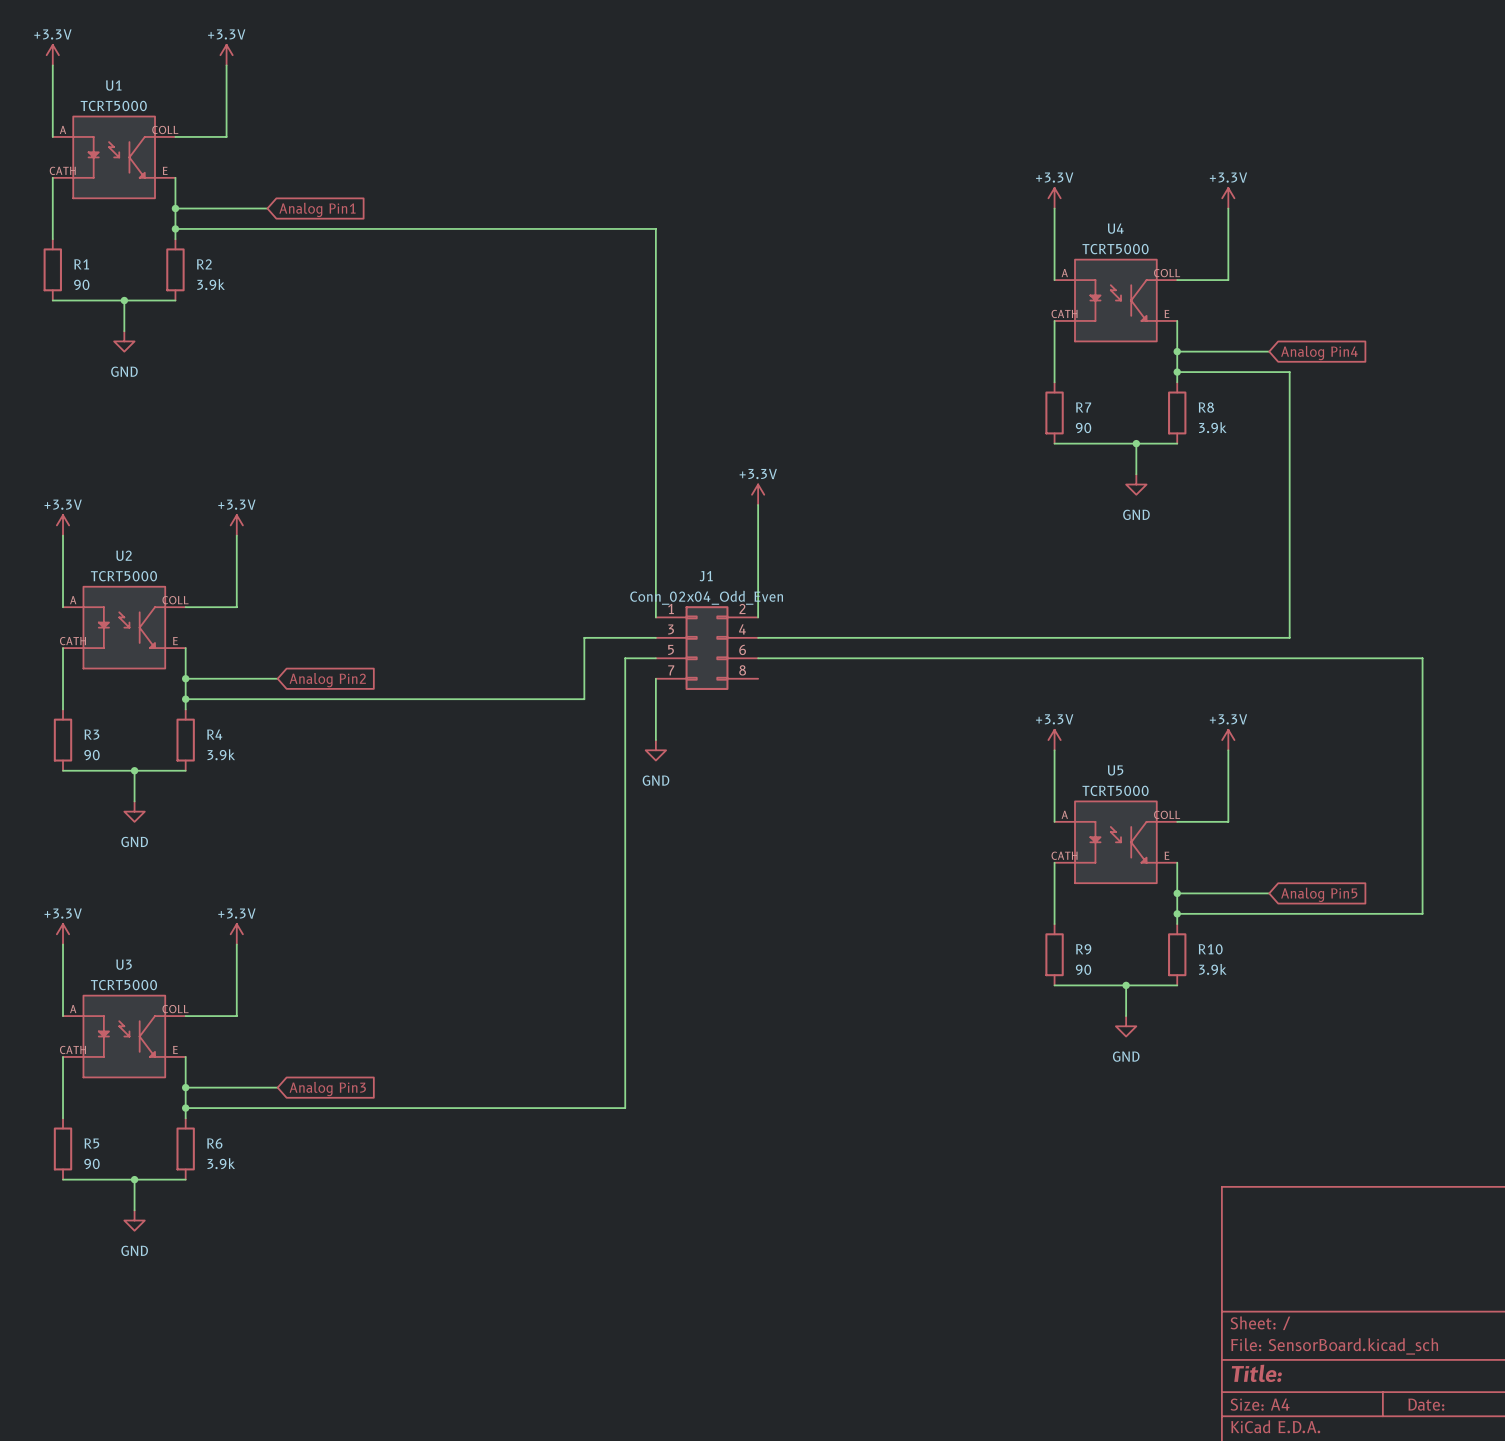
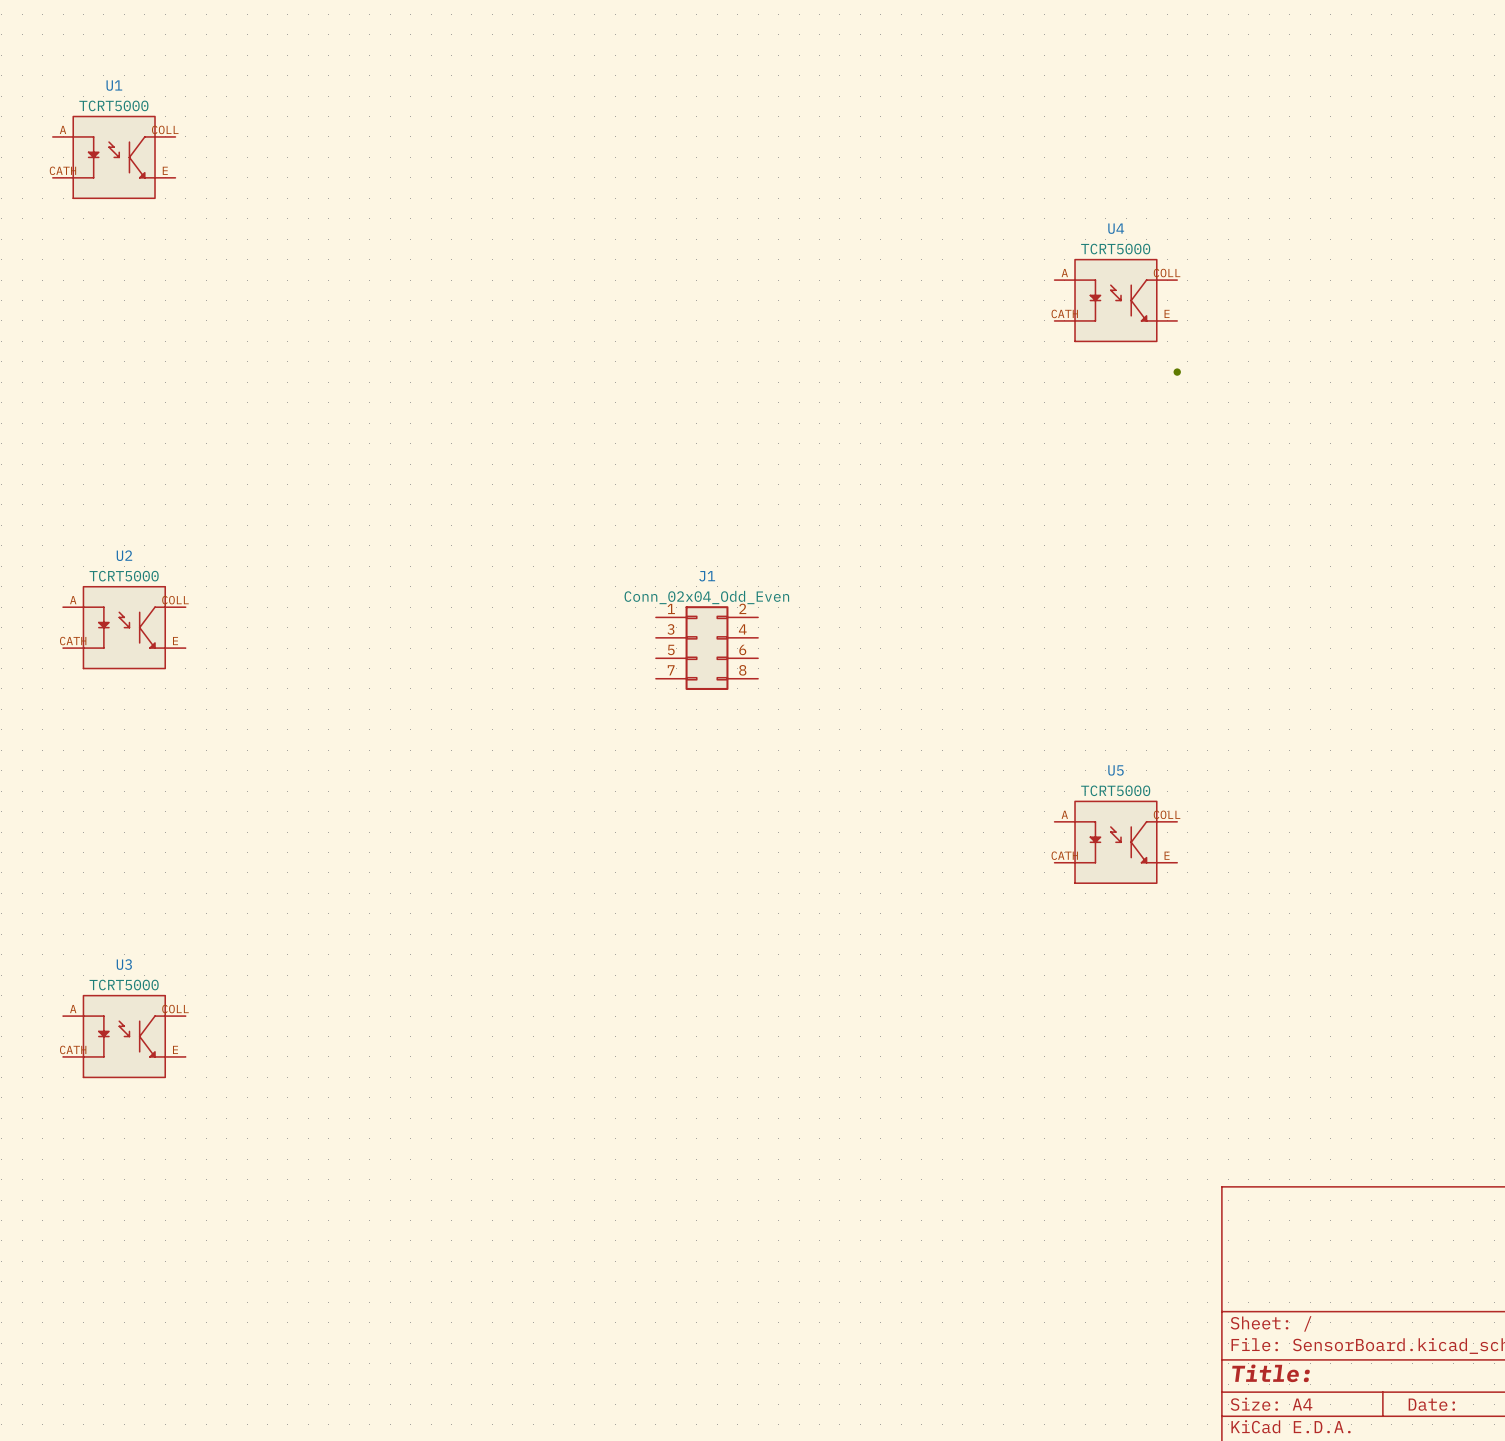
power symbol: +3.3V (52, 55) -> none
power symbol: +3.3V (226, 55) -> none
wire: (52, 65) (52, 136) -> none
wire: (226, 65) (226, 136) (175, 136) -> none
wire: (52, 177) (52, 239) -> none
wire: (175, 177) (175, 239) -> none
power symbol: +3.3V (1054, 198) -> none
power symbol: +3.3V (1228, 198) -> none
wire: (175, 208) (267, 208) -> none
junction: (175, 208) -> none
wire: (1054, 208) (1054, 280) -> none
wire: (1228, 208) (1228, 280) (1177, 280) -> none
global label: Analog Pin1 (317, 209) -> none
wire: (175, 228) (655, 228) (655, 617) -> none
junction: (175, 228) -> none
R1: 90 (52, 269) -> none
R2: 3.9k (175, 269) -> none
wire: (52, 300) (175, 300) -> none
wire: (124, 300) (124, 331) -> none
junction: (124, 300) -> none
wire: (1054, 320) (1054, 382) -> none
wire: (1177, 320) (1177, 382) -> none
power symbol: GND (124, 341) -> none
wire: (1177, 351) (1269, 351) -> none
junction: (1177, 351) -> none
global label: Analog Pin4 (1319, 353) -> none
wire: (1177, 372) (1289, 372) (1289, 637) (758, 637) -> none
R7: 90 (1054, 412) -> none
R8: 3.9k (1177, 412) -> none
wire: (1054, 443) (1177, 443) -> none
wire: (1136, 443) (1136, 474) -> none
junction: (1136, 443) -> none
power symbol: GND (1136, 484) -> none
power symbol: +3.3V (758, 494) -> none
wire: (758, 504) (758, 617) -> none
power symbol: +3.3V (63, 525) -> none
power symbol: +3.3V (236, 525) -> none
wire: (63, 535) (63, 607) -> none
wire: (236, 535) (236, 607) (185, 607) -> none
wire: (655, 637) (584, 637) (584, 699) (185, 699) -> none
wire: (63, 648) (63, 709) -> none
wire: (185, 648) (185, 709) -> none
wire: (655, 658) (625, 658) (625, 1108) (185, 1108) -> none
wire: (758, 658) (1422, 658) (1422, 913) (1177, 913) -> none
wire: (185, 678) (277, 678) -> none
junction: (185, 678) -> none
wire: (655, 678) (655, 740) -> none
global label: Analog Pin2 (327, 680) -> none
junction: (185, 699) -> none
R3: 90 (63, 740) -> none
R4: 3.9k (185, 740) -> none
power symbol: +3.3V (1054, 740) -> none
power symbol: +3.3V (1228, 740) -> none
power symbol: GND (655, 750) -> none
wire: (1054, 750) (1054, 821) -> none
wire: (1228, 750) (1228, 821) (1177, 821) -> none
wire: (63, 770) (185, 770) -> none
wire: (134, 770) (134, 801) -> none
junction: (134, 770) -> none
power symbol: GND (134, 811) -> none
wire: (1054, 862) (1054, 924) -> none
wire: (1177, 862) (1177, 924) -> none
wire: (1177, 893) (1269, 893) -> none
junction: (1177, 893) -> none
global label: Analog Pin5 (1319, 894) -> none
junction: (1177, 913) -> none
power symbol: +3.3V (63, 934) -> none
power symbol: +3.3V (236, 934) -> none
wire: (63, 944) (63, 1016) -> none
wire: (236, 944) (236, 1016) (185, 1016) -> none
R9: 90 (1054, 954) -> none
R10: 3.9k (1177, 954) -> none
wire: (1054, 985) (1177, 985) -> none
wire: (1126, 985) (1126, 1016) -> none
junction: (1126, 985) -> none
power symbol: GND (1126, 1026) -> none
wire: (63, 1056) (63, 1118) -> none
wire: (185, 1056) (185, 1118) -> none
wire: (185, 1087) (277, 1087) -> none
junction: (185, 1087) -> none
global label: Analog Pin3 (327, 1089) -> none
junction: (185, 1108) -> none
R5: 90 (63, 1148) -> none
R6: 3.9k (185, 1148) -> none
wire: (63, 1179) (185, 1179) -> none
wire: (134, 1179) (134, 1210) -> none
junction: (134, 1179) -> none
power symbol: GND (134, 1220) -> none

